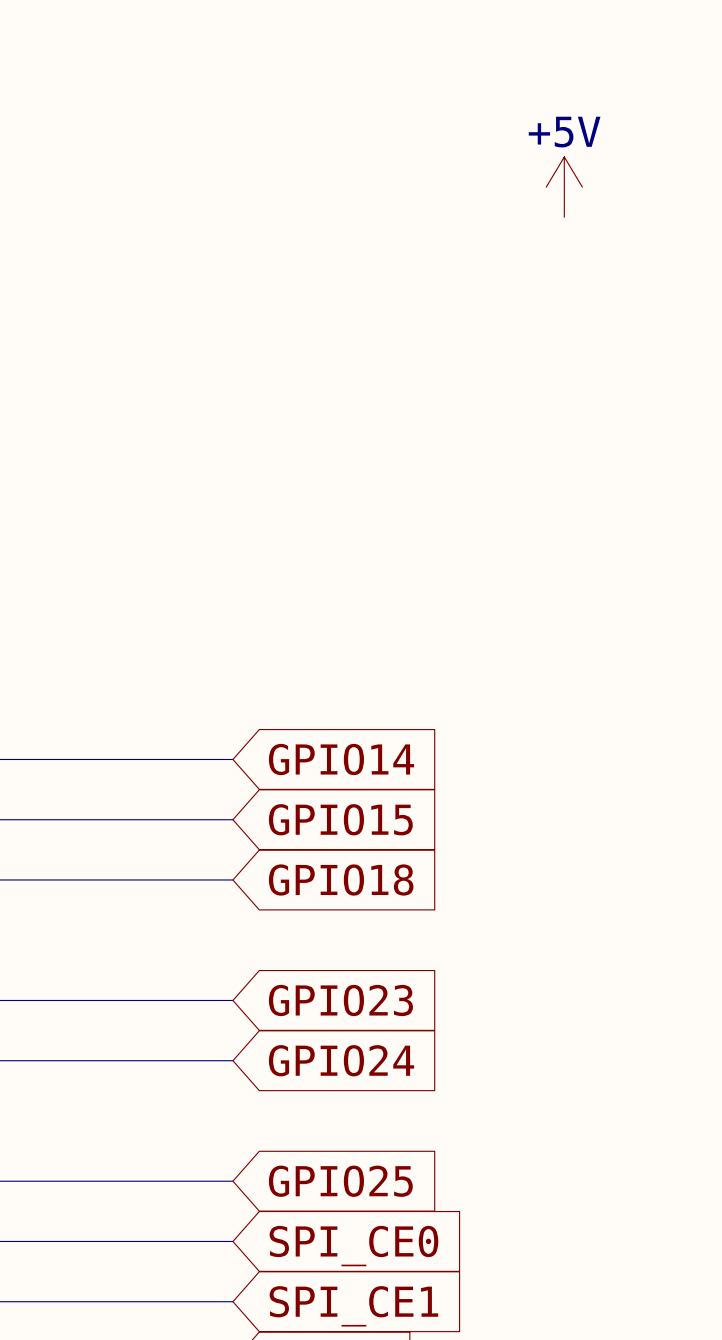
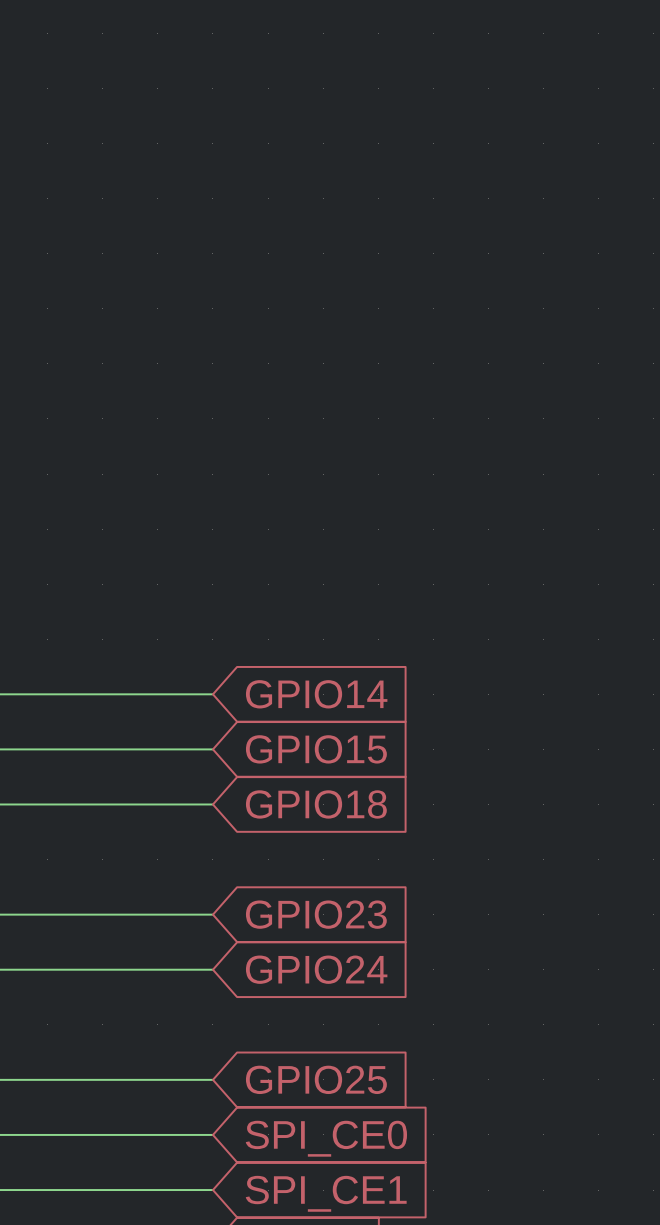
power symbol: +5V (564, 187) -> none

